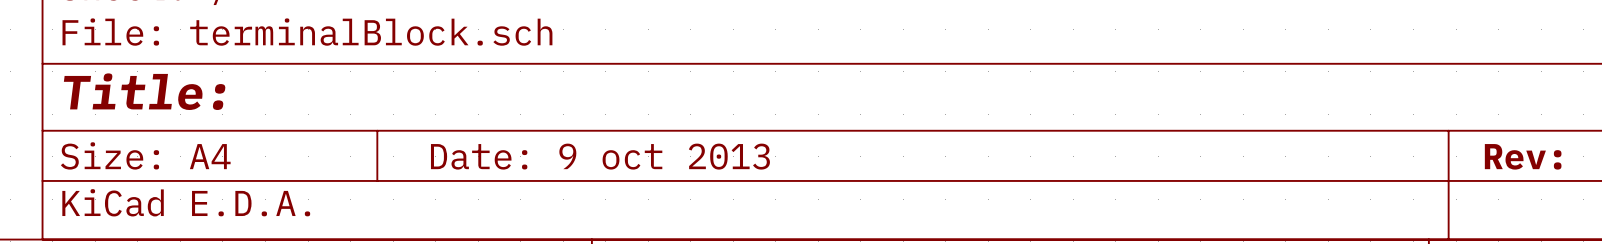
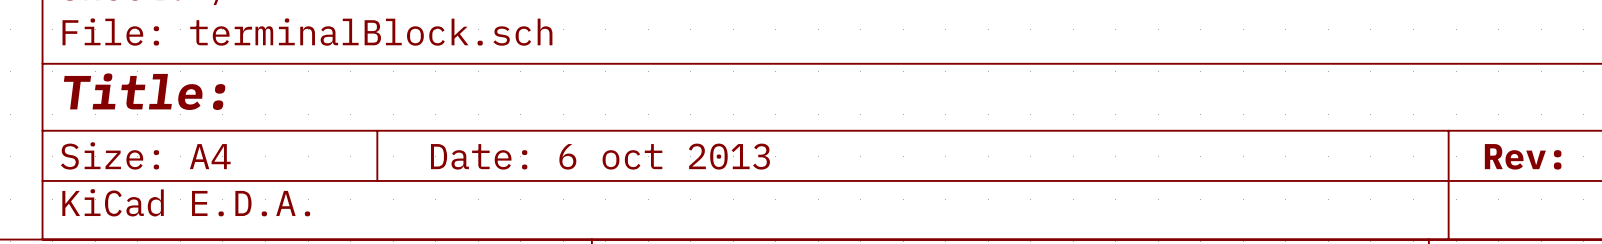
title block: Date: 9 oct 2013 (600, 156) -> Date: 6 oct 2013 (600, 156)

